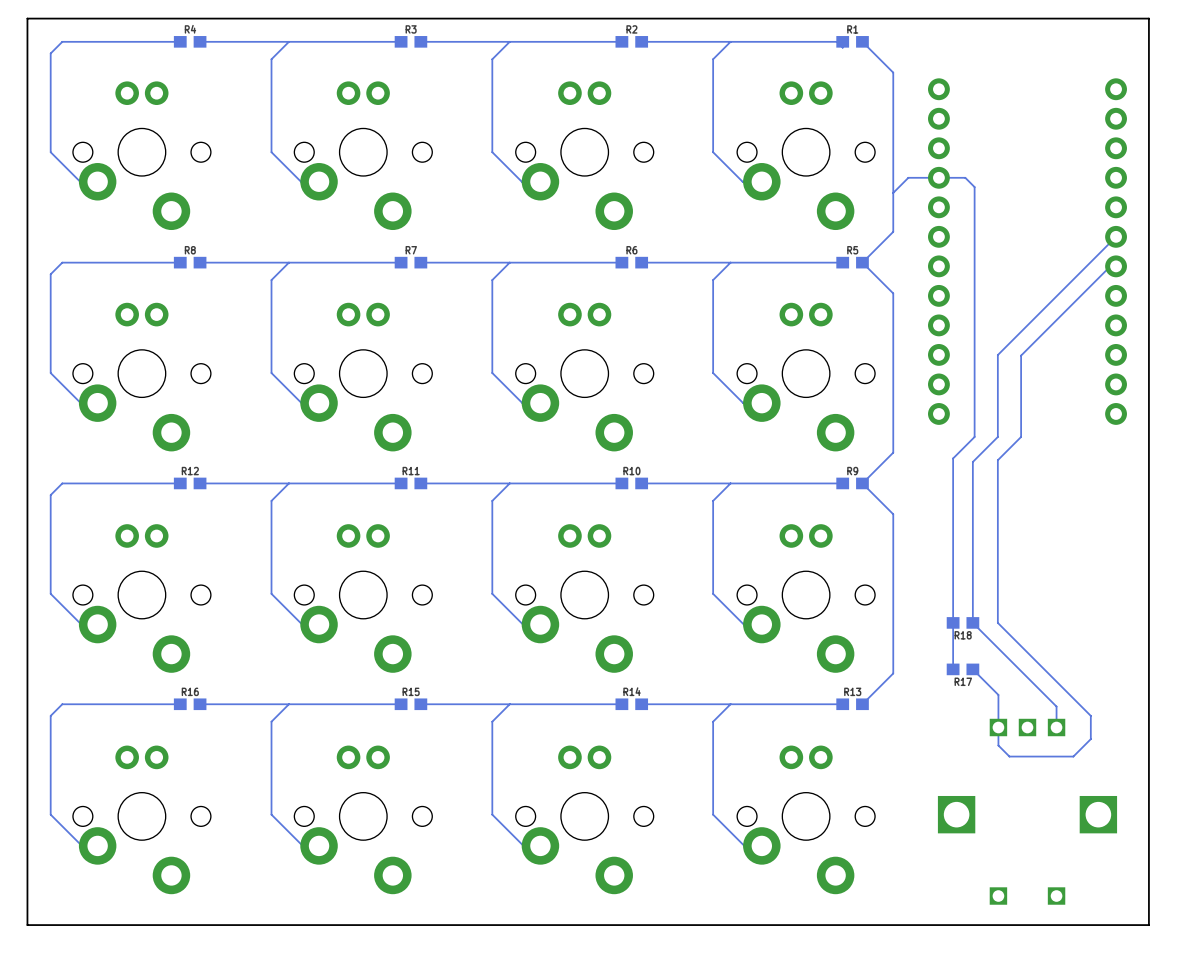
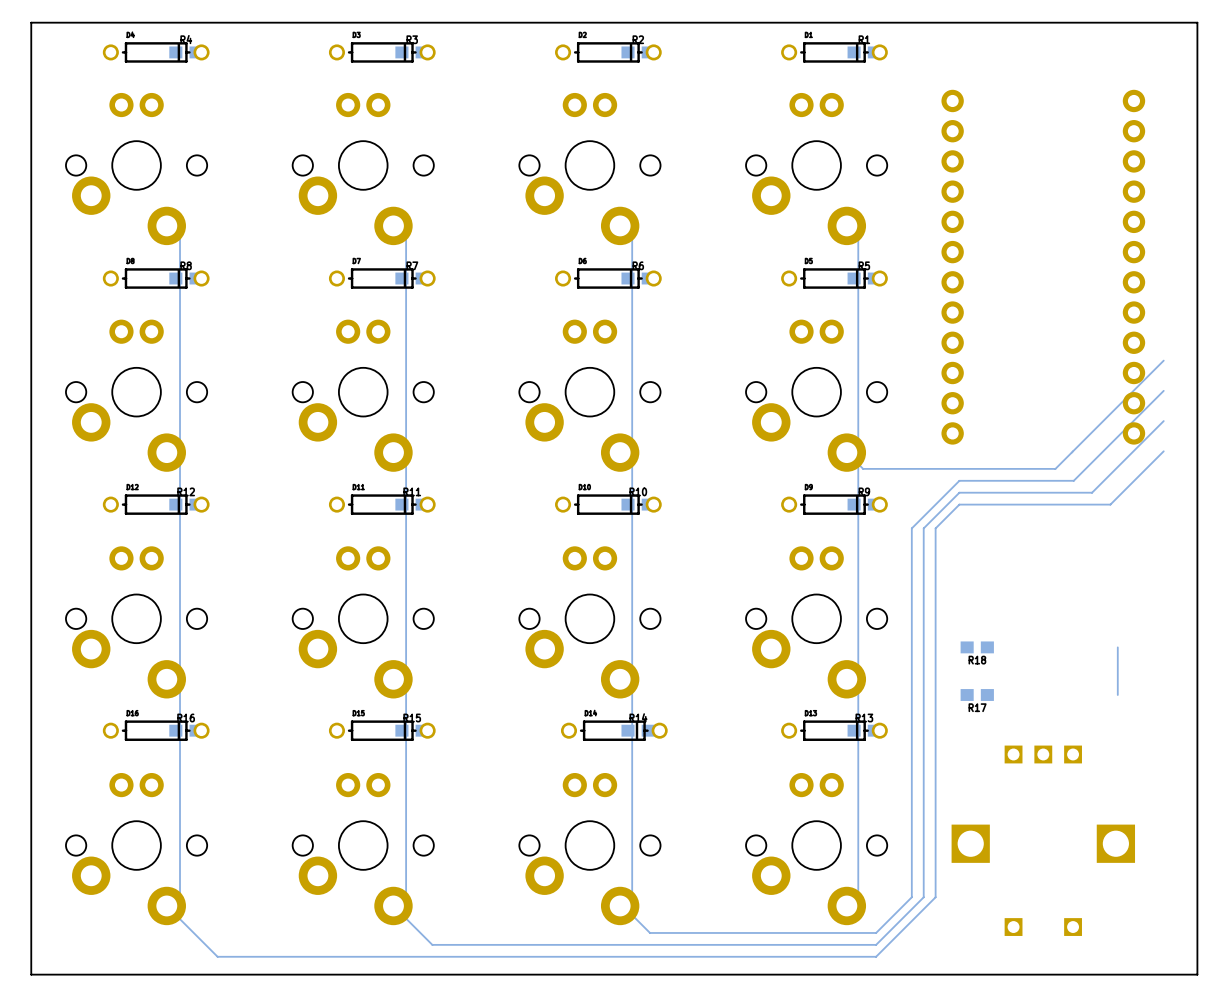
board edge: (1148, 18) (27, 18) (27, 925) (1148, 925) (1148, 18) -> (1197, 22) (1197, 974) (31, 974) (31, 22) (1197, 22)
part: none -> (156, 52)
track: (180, 41) (62, 41) (50, 53) (50, 152) (80, 181) (97, 181) -> none
track: (288, 41) (271, 59) (271, 152) (301, 181) (319, 181) -> none
part: none -> (382, 52)
track: (401, 41) (200, 41) -> none
track: (509, 41) (492, 59) (492, 152) (521, 181) (540, 181) -> none
part: none -> (608, 52)
track: (621, 41) (420, 41) -> none
track: (730, 41) (713, 59) (713, 152) (742, 181) (761, 181) -> none
part: none -> (834, 52)
track: (842, 41) (842, 47) (836, 41) (641, 41) -> none
track: (862, 41) (893, 72) (893, 231) (862, 262) (893, 293) (893, 452) (862, 483) (893, 514) (893, 673) (862, 704) -> none
track: (893, 192) (908, 177) (965, 177) (974, 187) (974, 436) (953, 458) (953, 669) -> none
track: none -> (166, 225) (180, 239) (180, 439) (166, 452) (180, 465) (180, 666) (166, 679) (180, 692) (180, 892) (166, 905) (217, 956) (876, 956) (935, 897) (935, 528) (959, 504) (1110, 504) (1163, 451)
track: none -> (393, 225) (406, 238) (406, 439) (393, 452) (406, 465) (406, 666) (393, 679) (406, 691) (406, 893) (393, 905) (432, 944) (876, 944) (923, 897) (923, 528) (959, 492) (1092, 492) (1163, 421)
track: none -> (620, 225) (632, 237) (632, 440) (620, 452) (632, 464) (632, 667) (620, 679) (632, 691) (632, 893) (620, 905)
track: none -> (846, 225) (858, 237) (858, 441) (846, 452) (863, 468) (1055, 468) (1163, 360)
track: (1116, 236) (997, 355) (997, 436) (972, 461) (972, 622) (1056, 706) (1056, 727) -> none
part: none -> (156, 278)
track: (180, 262) (62, 262) (50, 274) (50, 373) (80, 403) (97, 403) -> none
track: (288, 262) (271, 280) (271, 373) (301, 403) (319, 403) -> none
part: none -> (382, 278)
track: (401, 262) (200, 262) -> none
track: (509, 262) (492, 280) (492, 373) (522, 403) (540, 403) -> none
part: none -> (608, 278)
track: (621, 262) (420, 262) -> none
track: (730, 262) (713, 280) (713, 373) (743, 403) (761, 403) -> none
part: none -> (834, 278)
track: (842, 262) (641, 262) -> none
track: (1116, 266) (1110, 266) (1021, 355) (1021, 436) (997, 460) (997, 622) (1090, 715) (1090, 739) (1073, 756) (1009, 756) (998, 745) (998, 694) (972, 669) -> none
track: none -> (1163, 390) (1073, 480) (959, 480) (911, 528) (911, 897) (876, 932) (650, 932) (621, 904)
track: none -> (858, 464) (858, 667) (846, 679) (858, 690) (858, 894) (846, 905)
part: none -> (156, 504)
track: (180, 483) (62, 483) (50, 495) (50, 593) (81, 624) (97, 624) -> none
track: (288, 483) (271, 500) (271, 593) (302, 624) (319, 624) -> none
part: none -> (382, 504)
track: (401, 483) (200, 483) -> none
track: (509, 483) (492, 500) (492, 593) (523, 624) (540, 624) -> none
part: none -> (608, 504)
track: (621, 483) (420, 483) -> none
track: (730, 483) (713, 500) (713, 593) (743, 624) (761, 624) -> none
part: none -> (834, 504)
track: (842, 483) (641, 483) -> none
track: none -> (1117, 647) (1117, 694)
part: none -> (156, 730)
track: (180, 704) (62, 704) (50, 715) (50, 814) (81, 845) (97, 845) -> none
track: (288, 704) (271, 721) (271, 814) (302, 845) (319, 845) -> none
part: none -> (382, 730)
track: (401, 704) (200, 704) -> none
track: (509, 704) (492, 721) (492, 814) (523, 845) (540, 845) -> none
part: none -> (614, 730)
track: (621, 704) (420, 704) -> none
track: (730, 704) (713, 721) (713, 814) (744, 845) (761, 845) -> none
part: none -> (834, 730)
track: (842, 704) (641, 704) -> none

